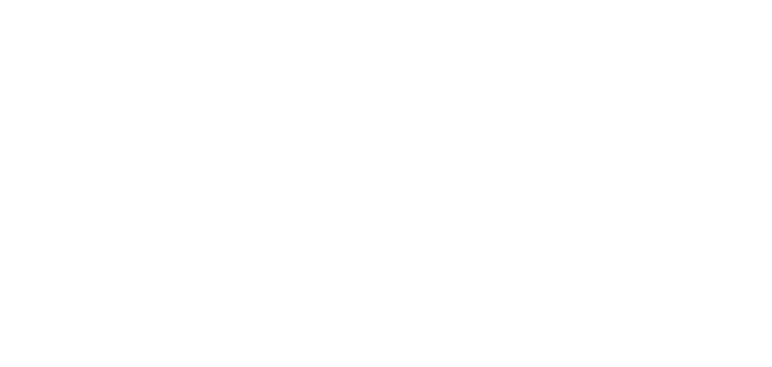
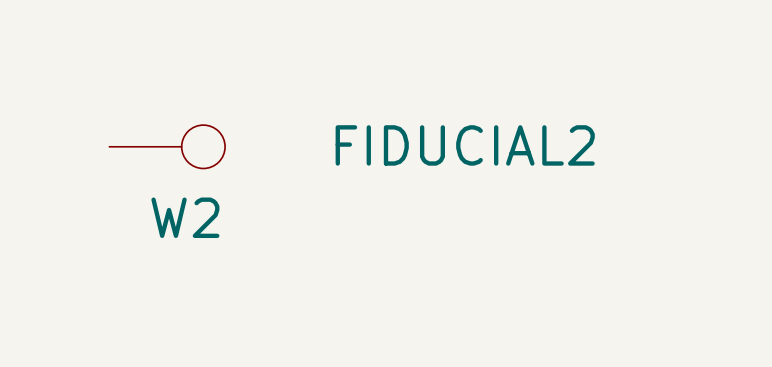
W2: none -> FIDUCIAL2 (167, 146)

